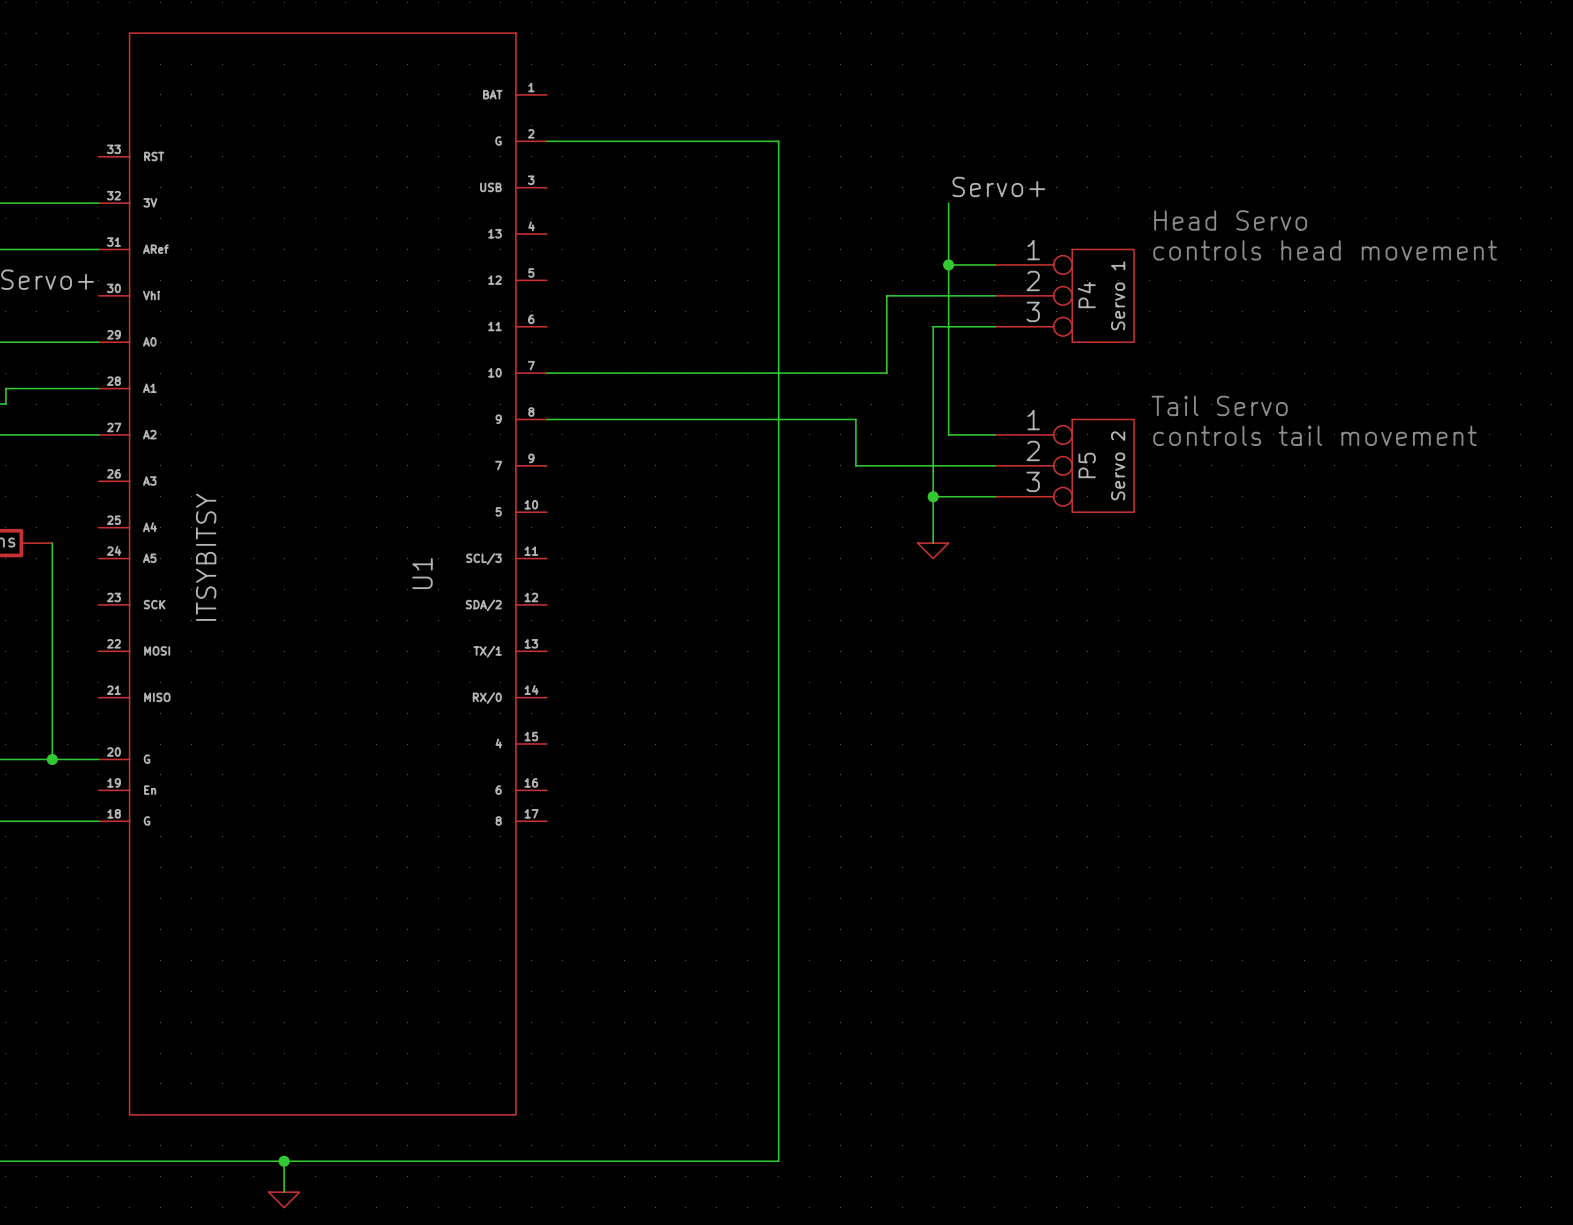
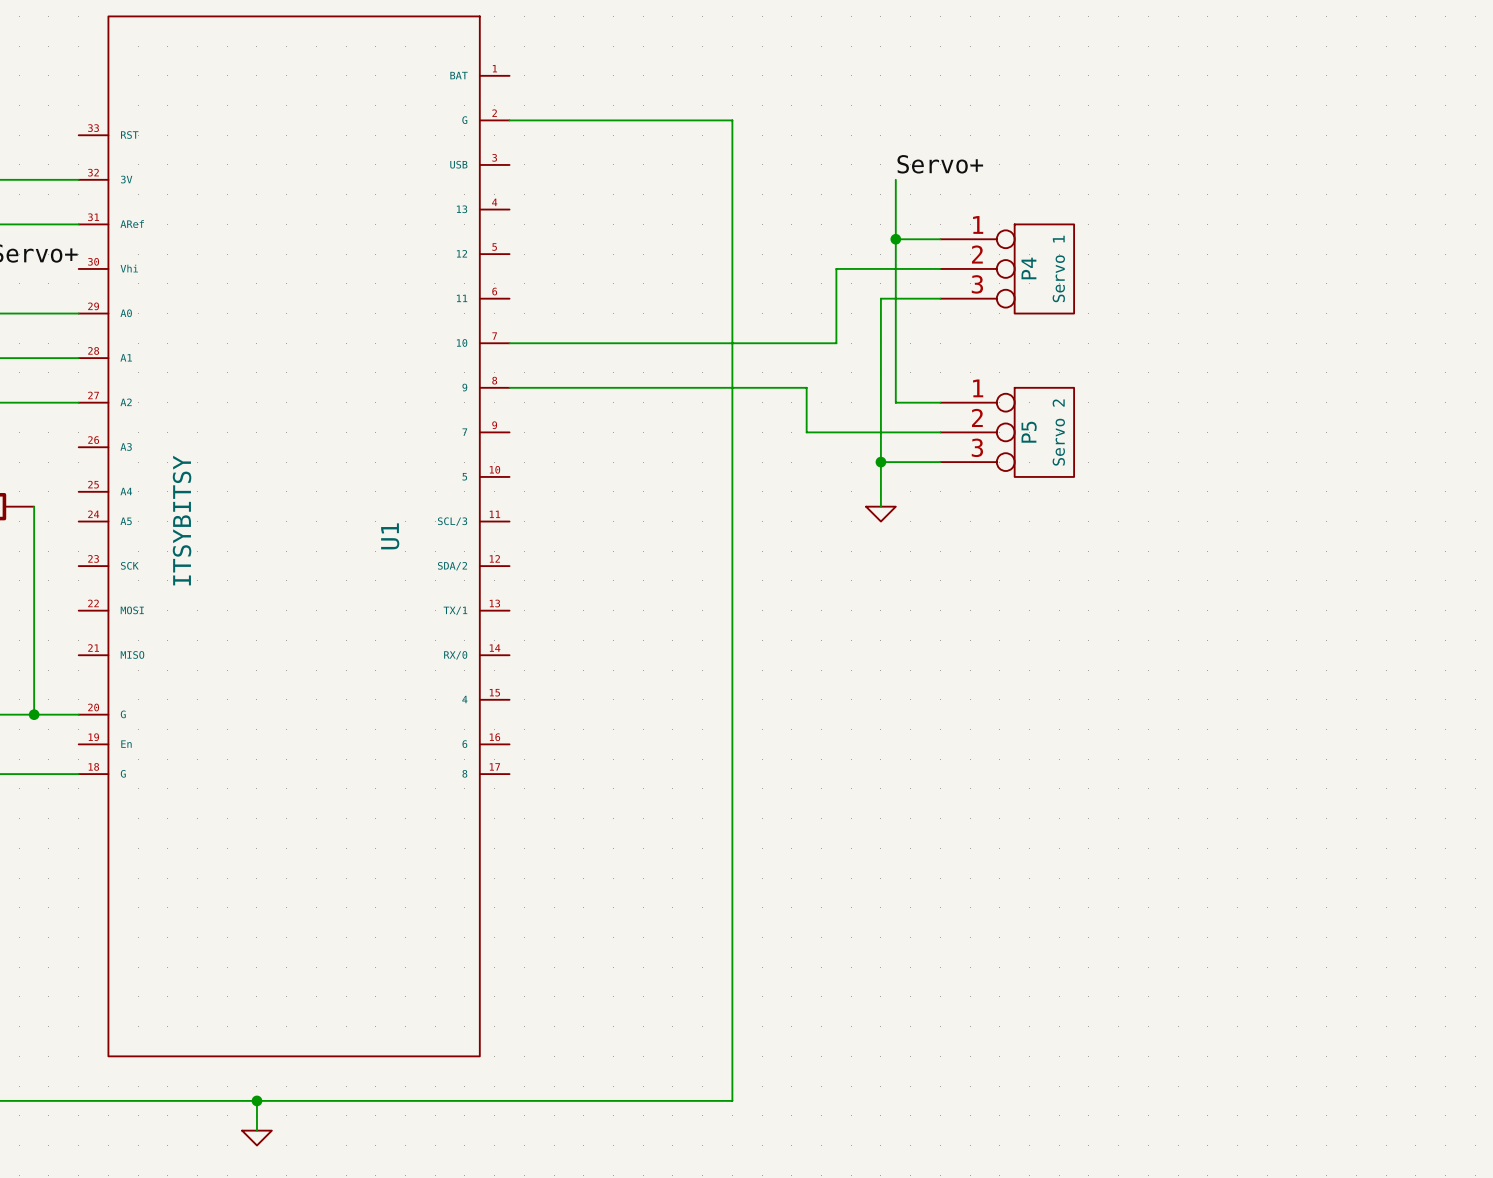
text: Head Servo (1230, 220) -> none
text: controls head movement (1325, 250) -> none
text: Tail Servo (1219, 405) -> none
text: controls tail movement (1314, 435) -> none

